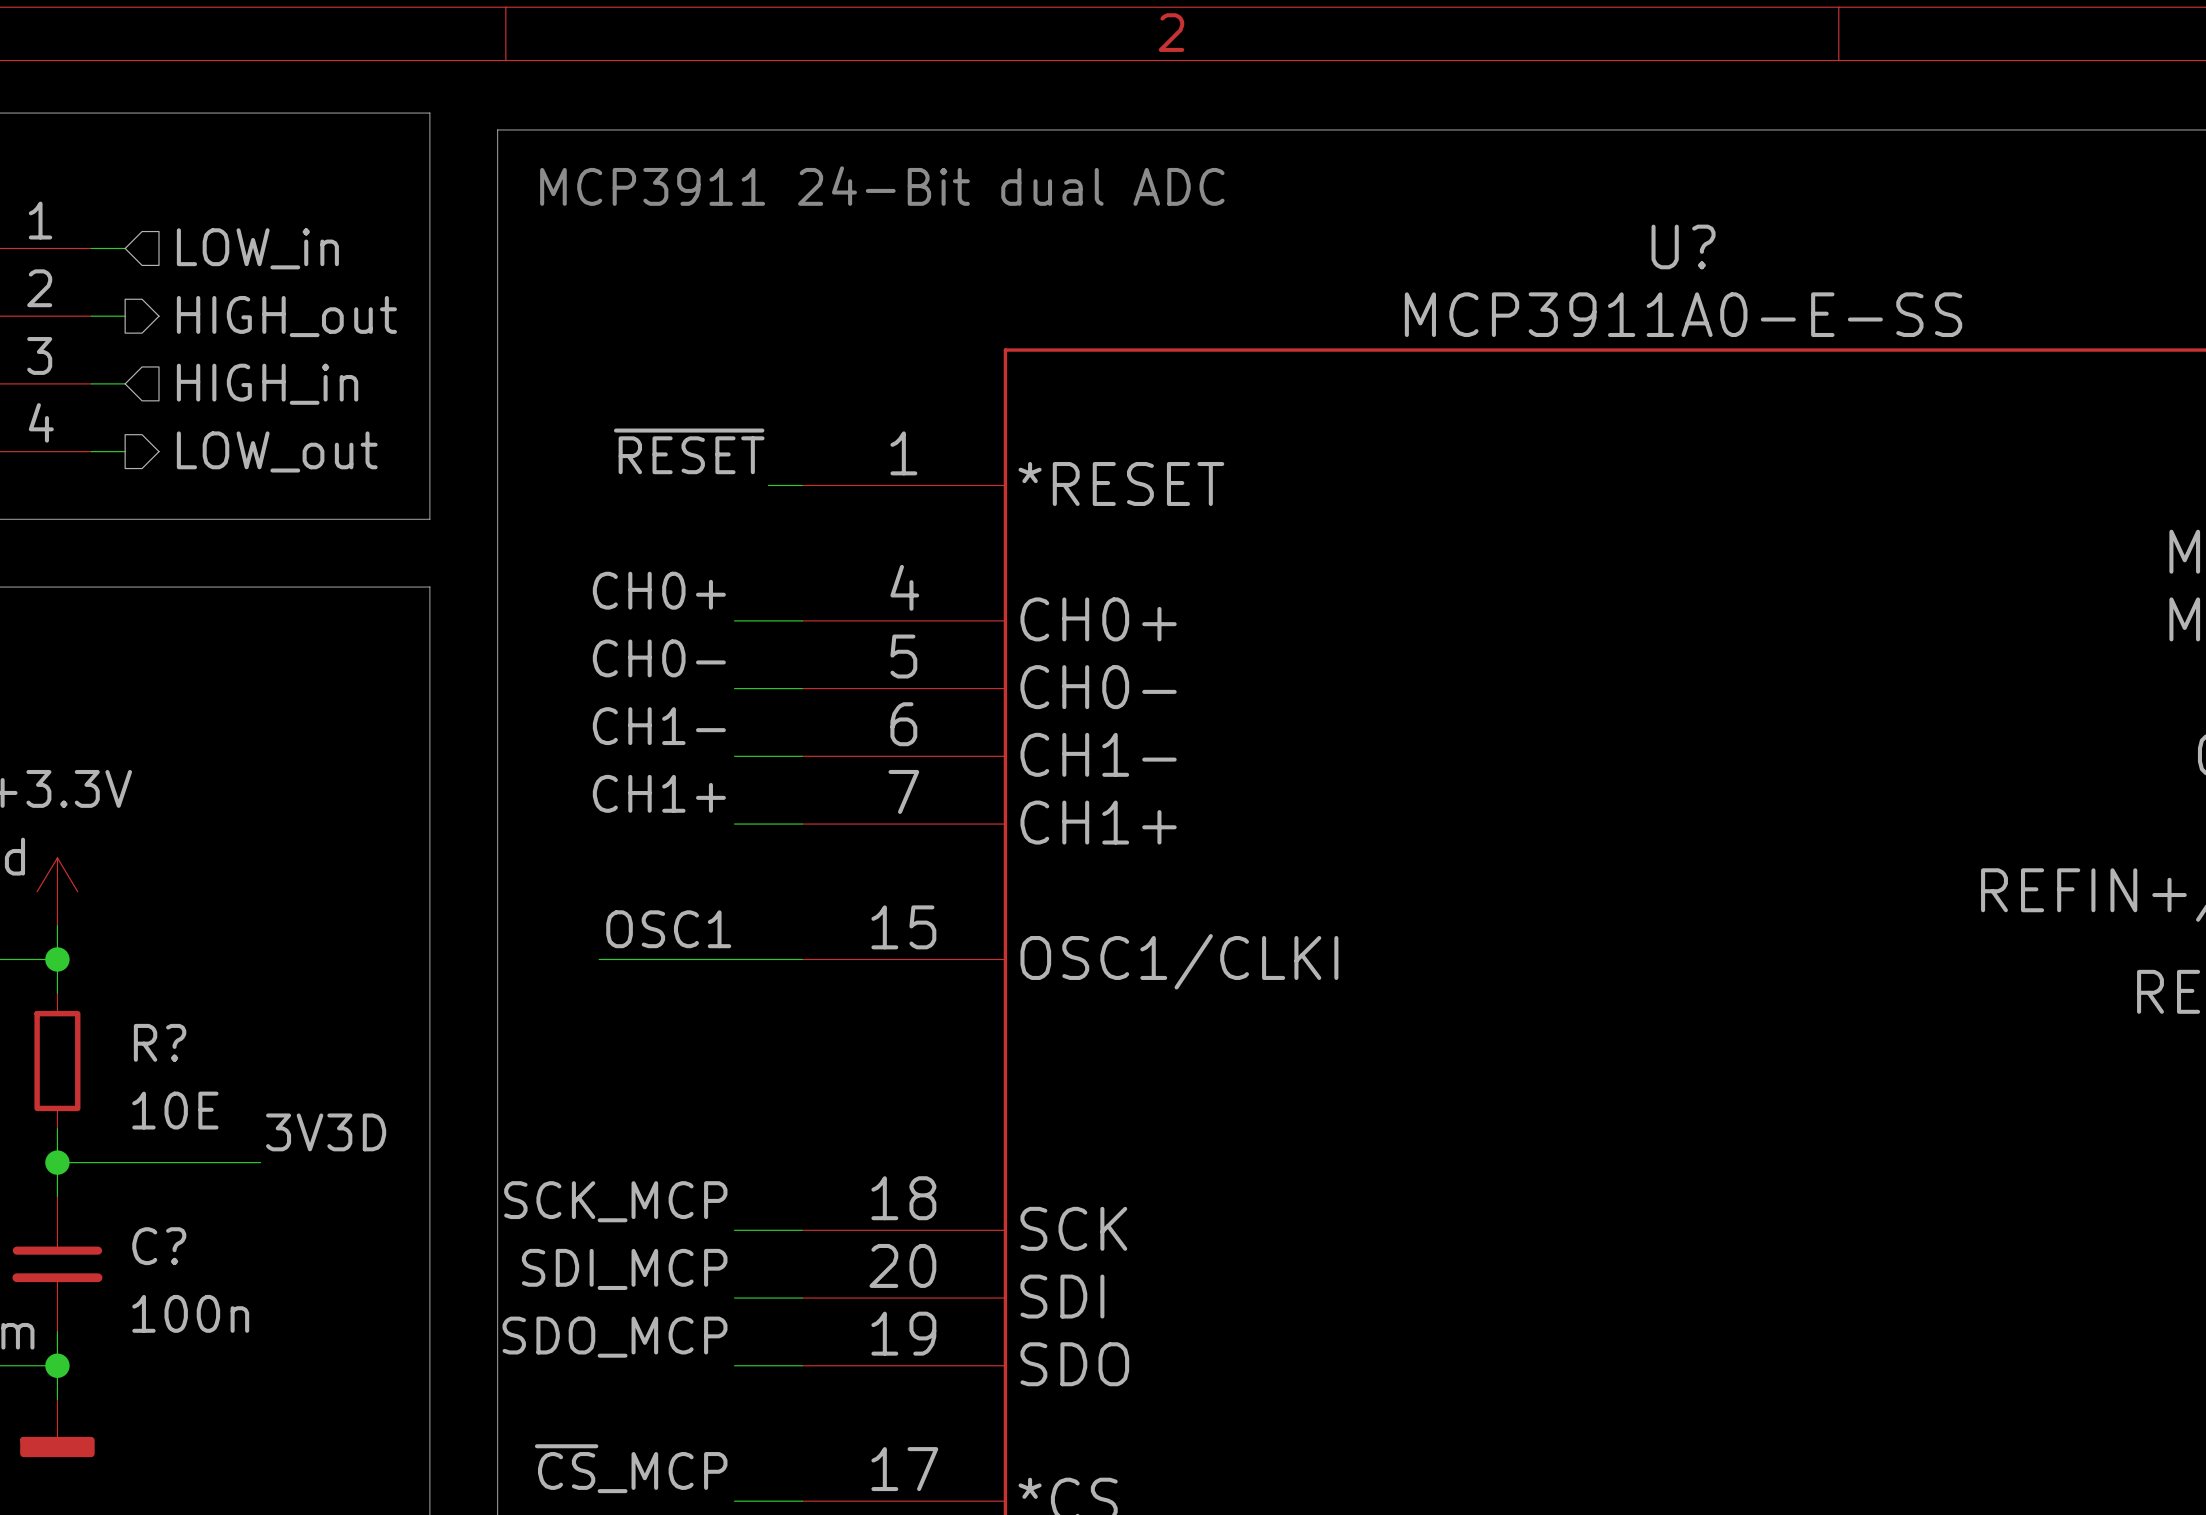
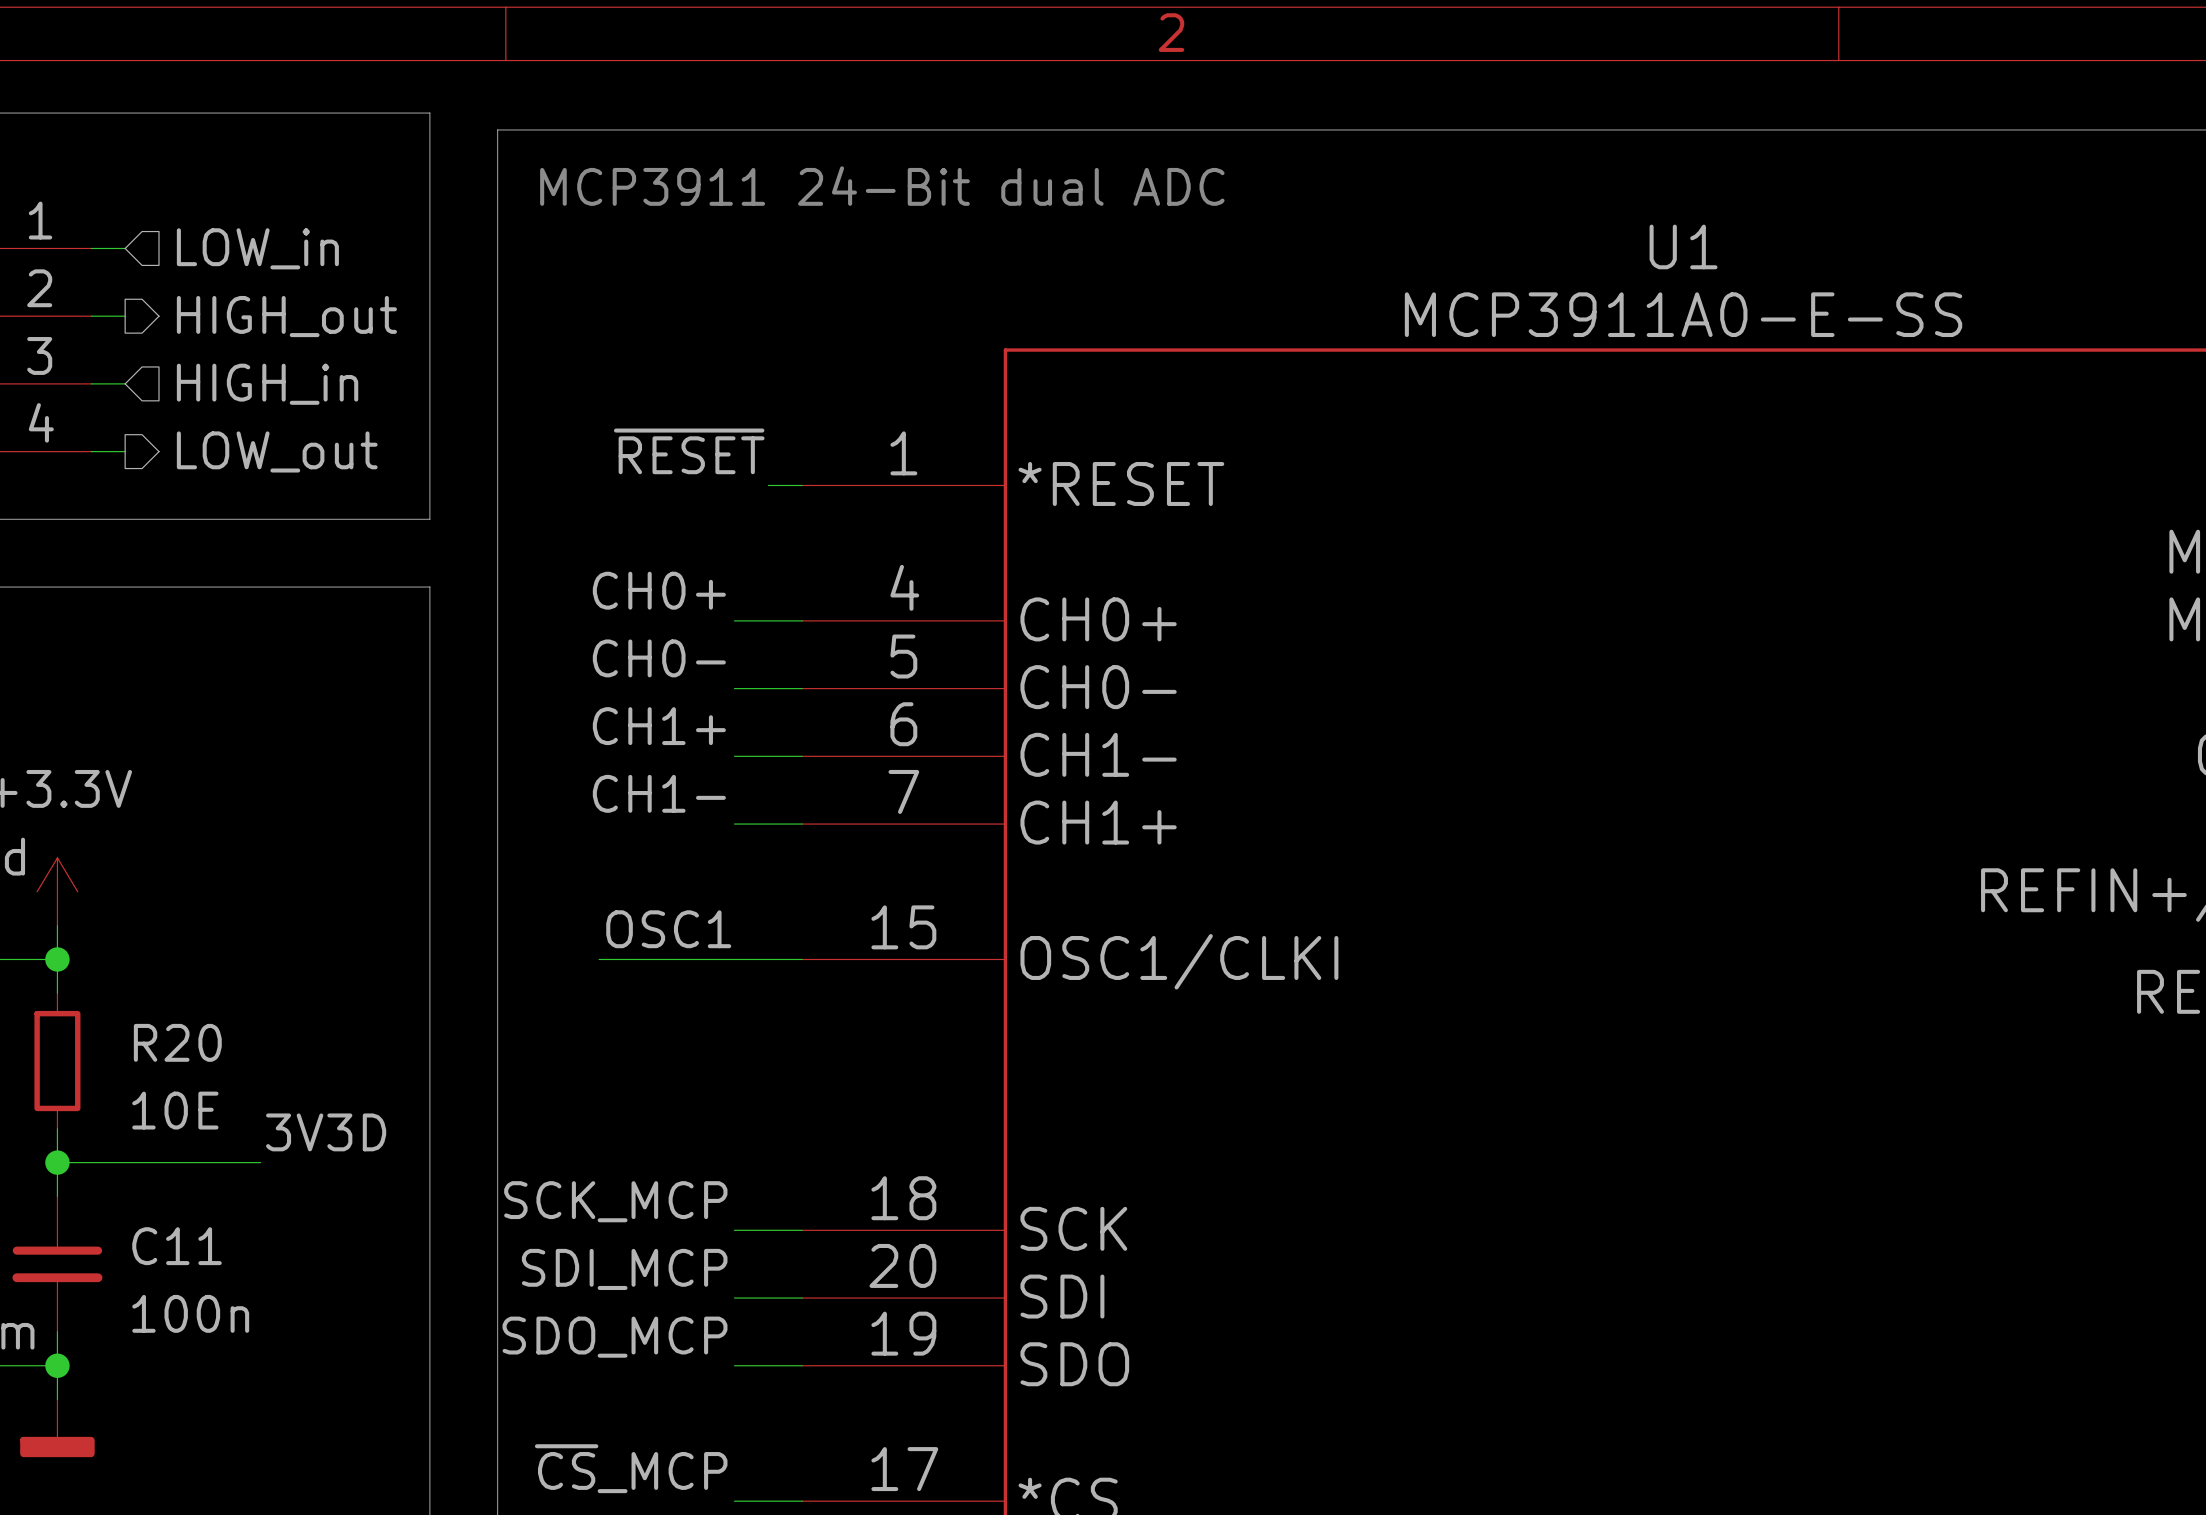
U? name: U? (1683, 246) -> U1 (1683, 246)
label: CH1- (659, 726) -> CH1+ (659, 726)
label: CH1+ (659, 793) -> CH1- (659, 793)
R? name: R? (160, 1042) -> R20 (177, 1042)
C? name: C? (159, 1246) -> C11 (176, 1246)

